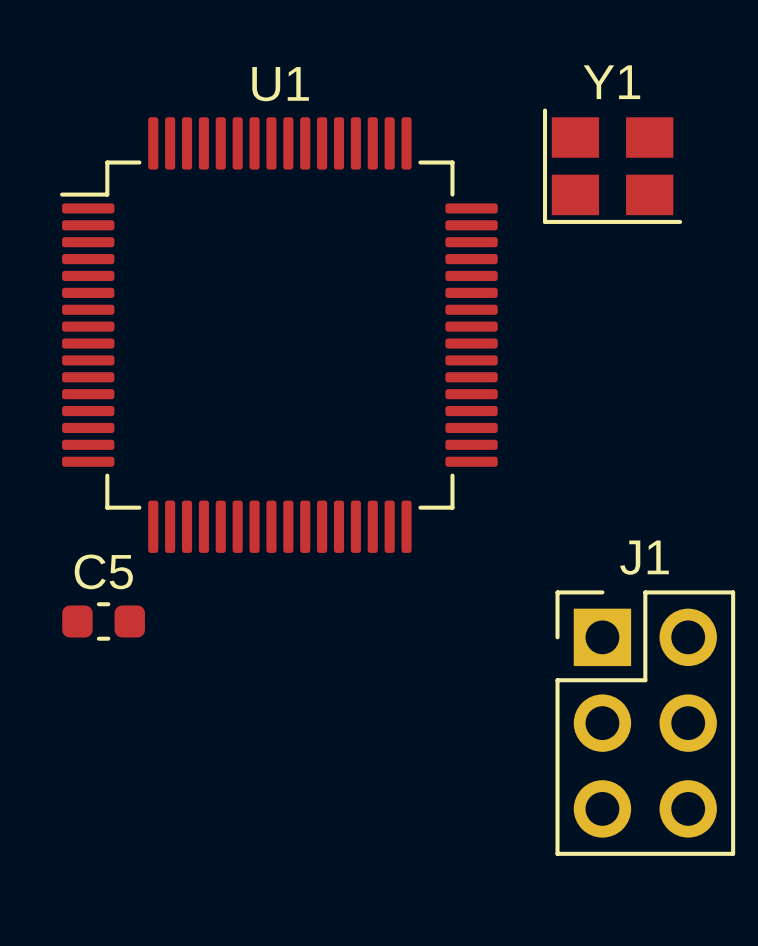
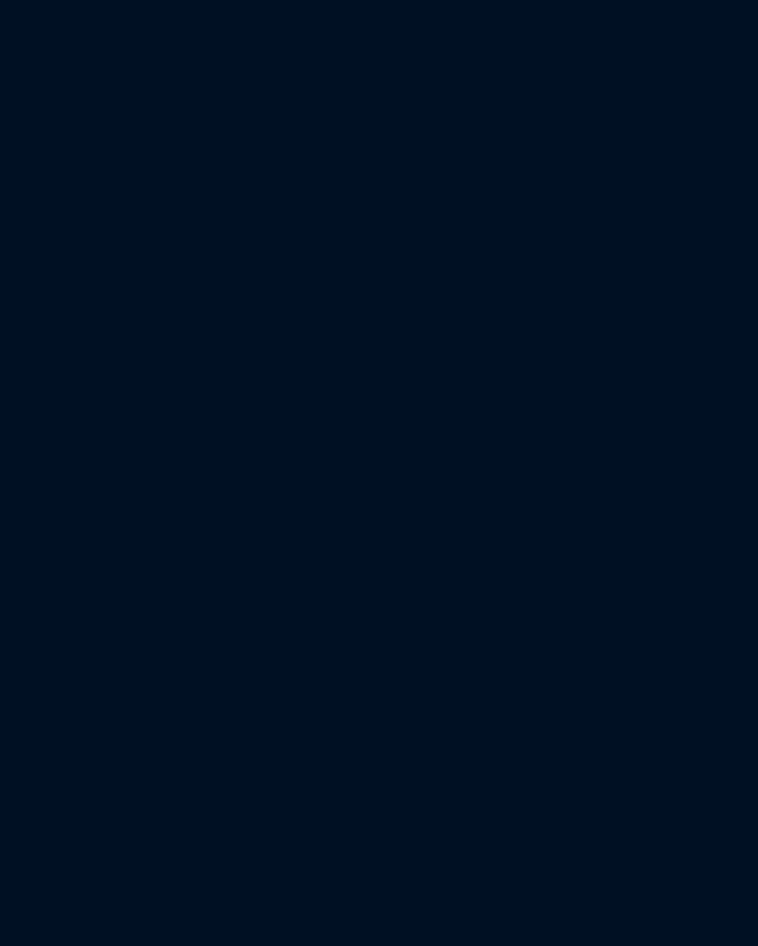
Y1: (612, 166) -> none
U1: (278, 335) -> none
C5: (103, 621) -> none
J1: (645, 723) -> none

